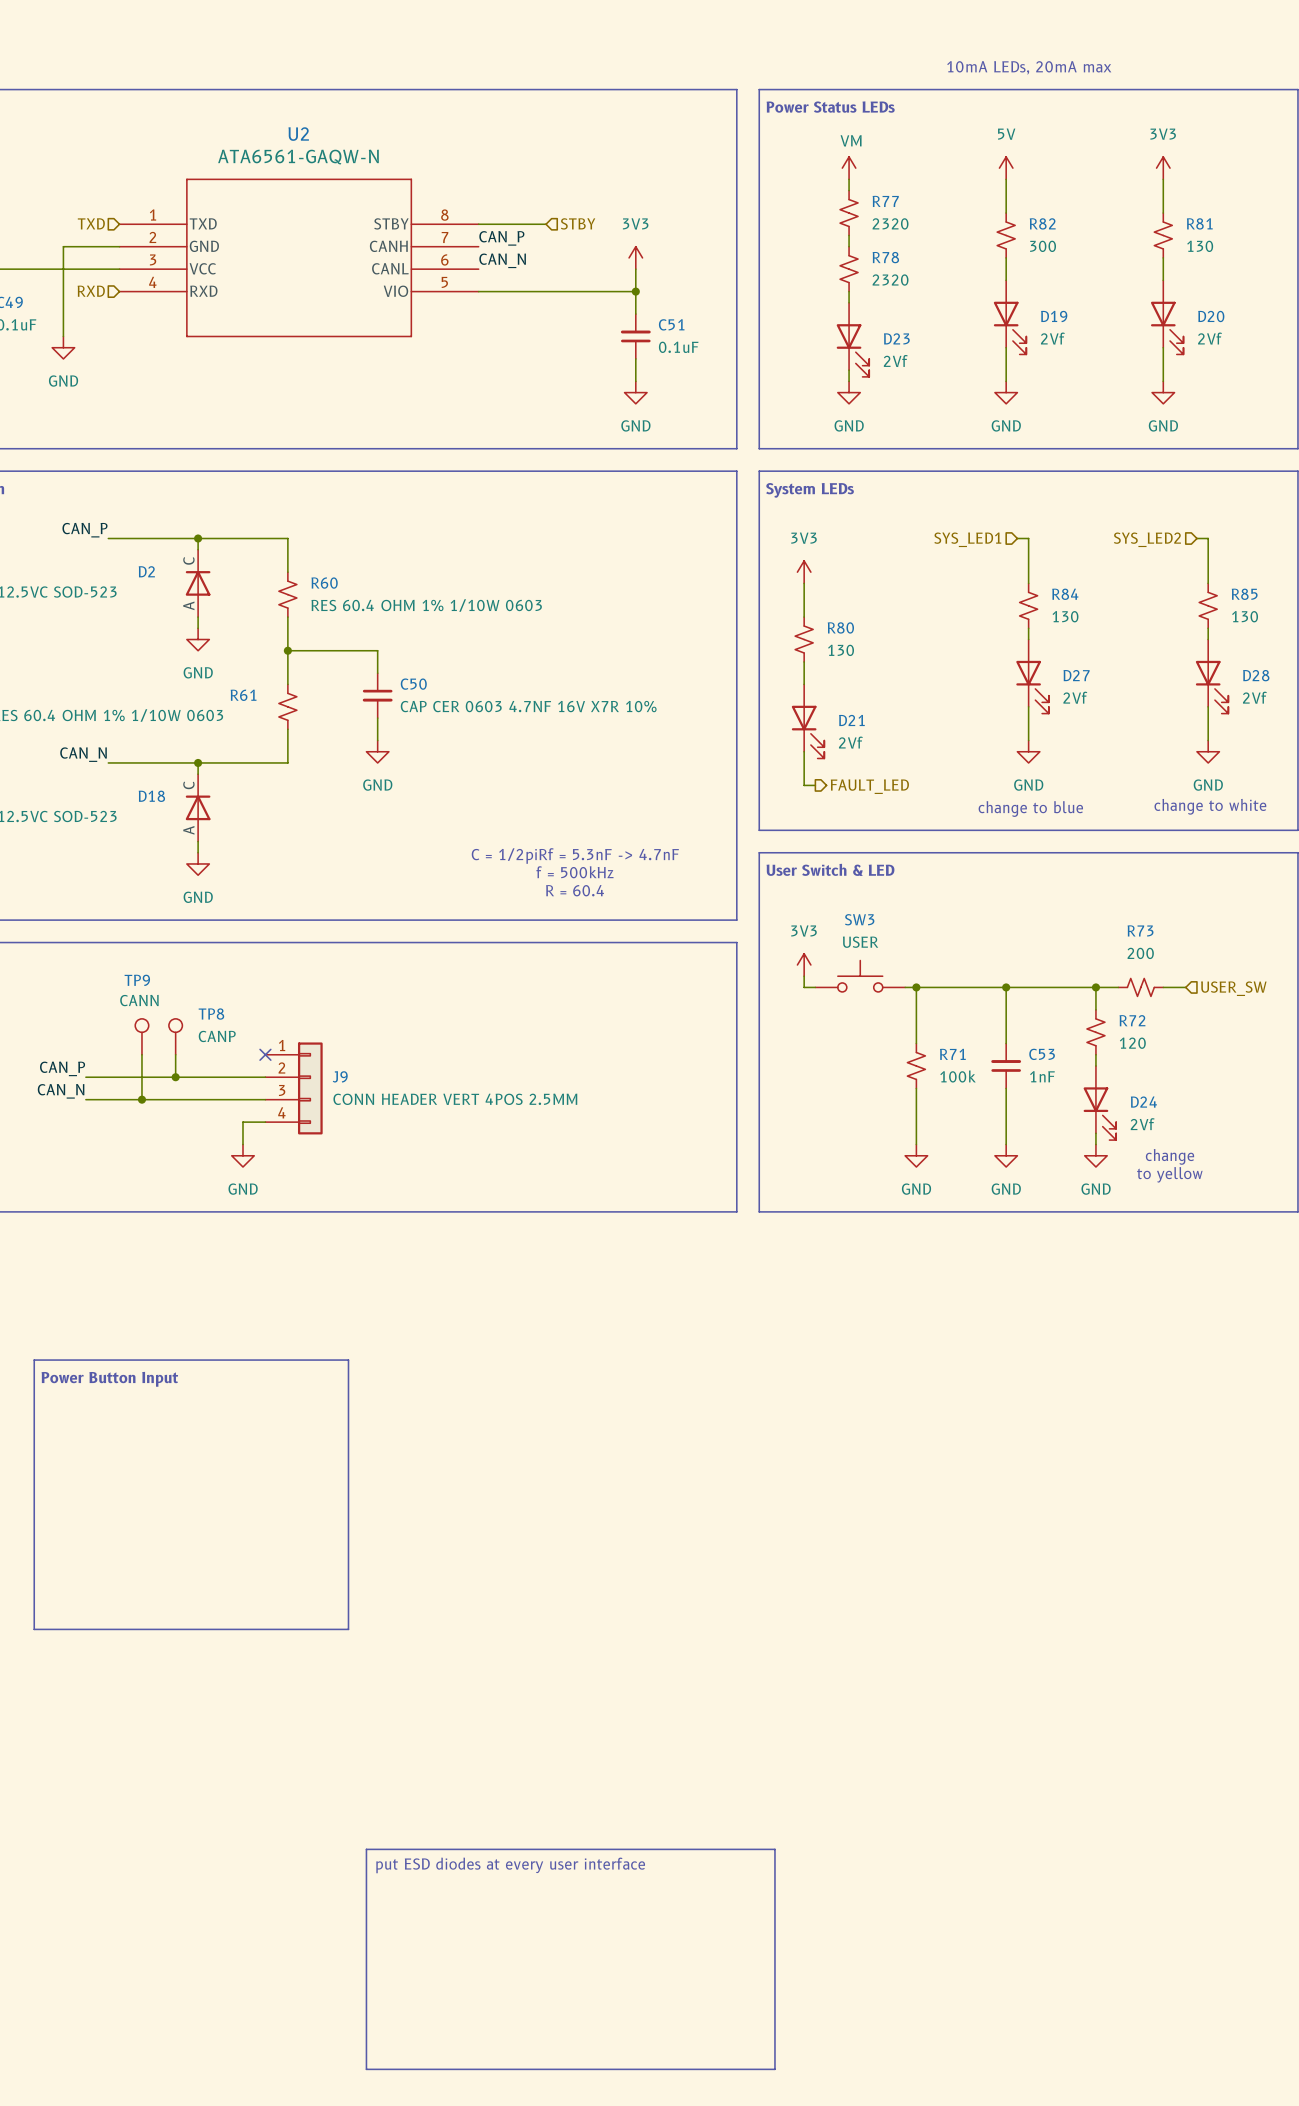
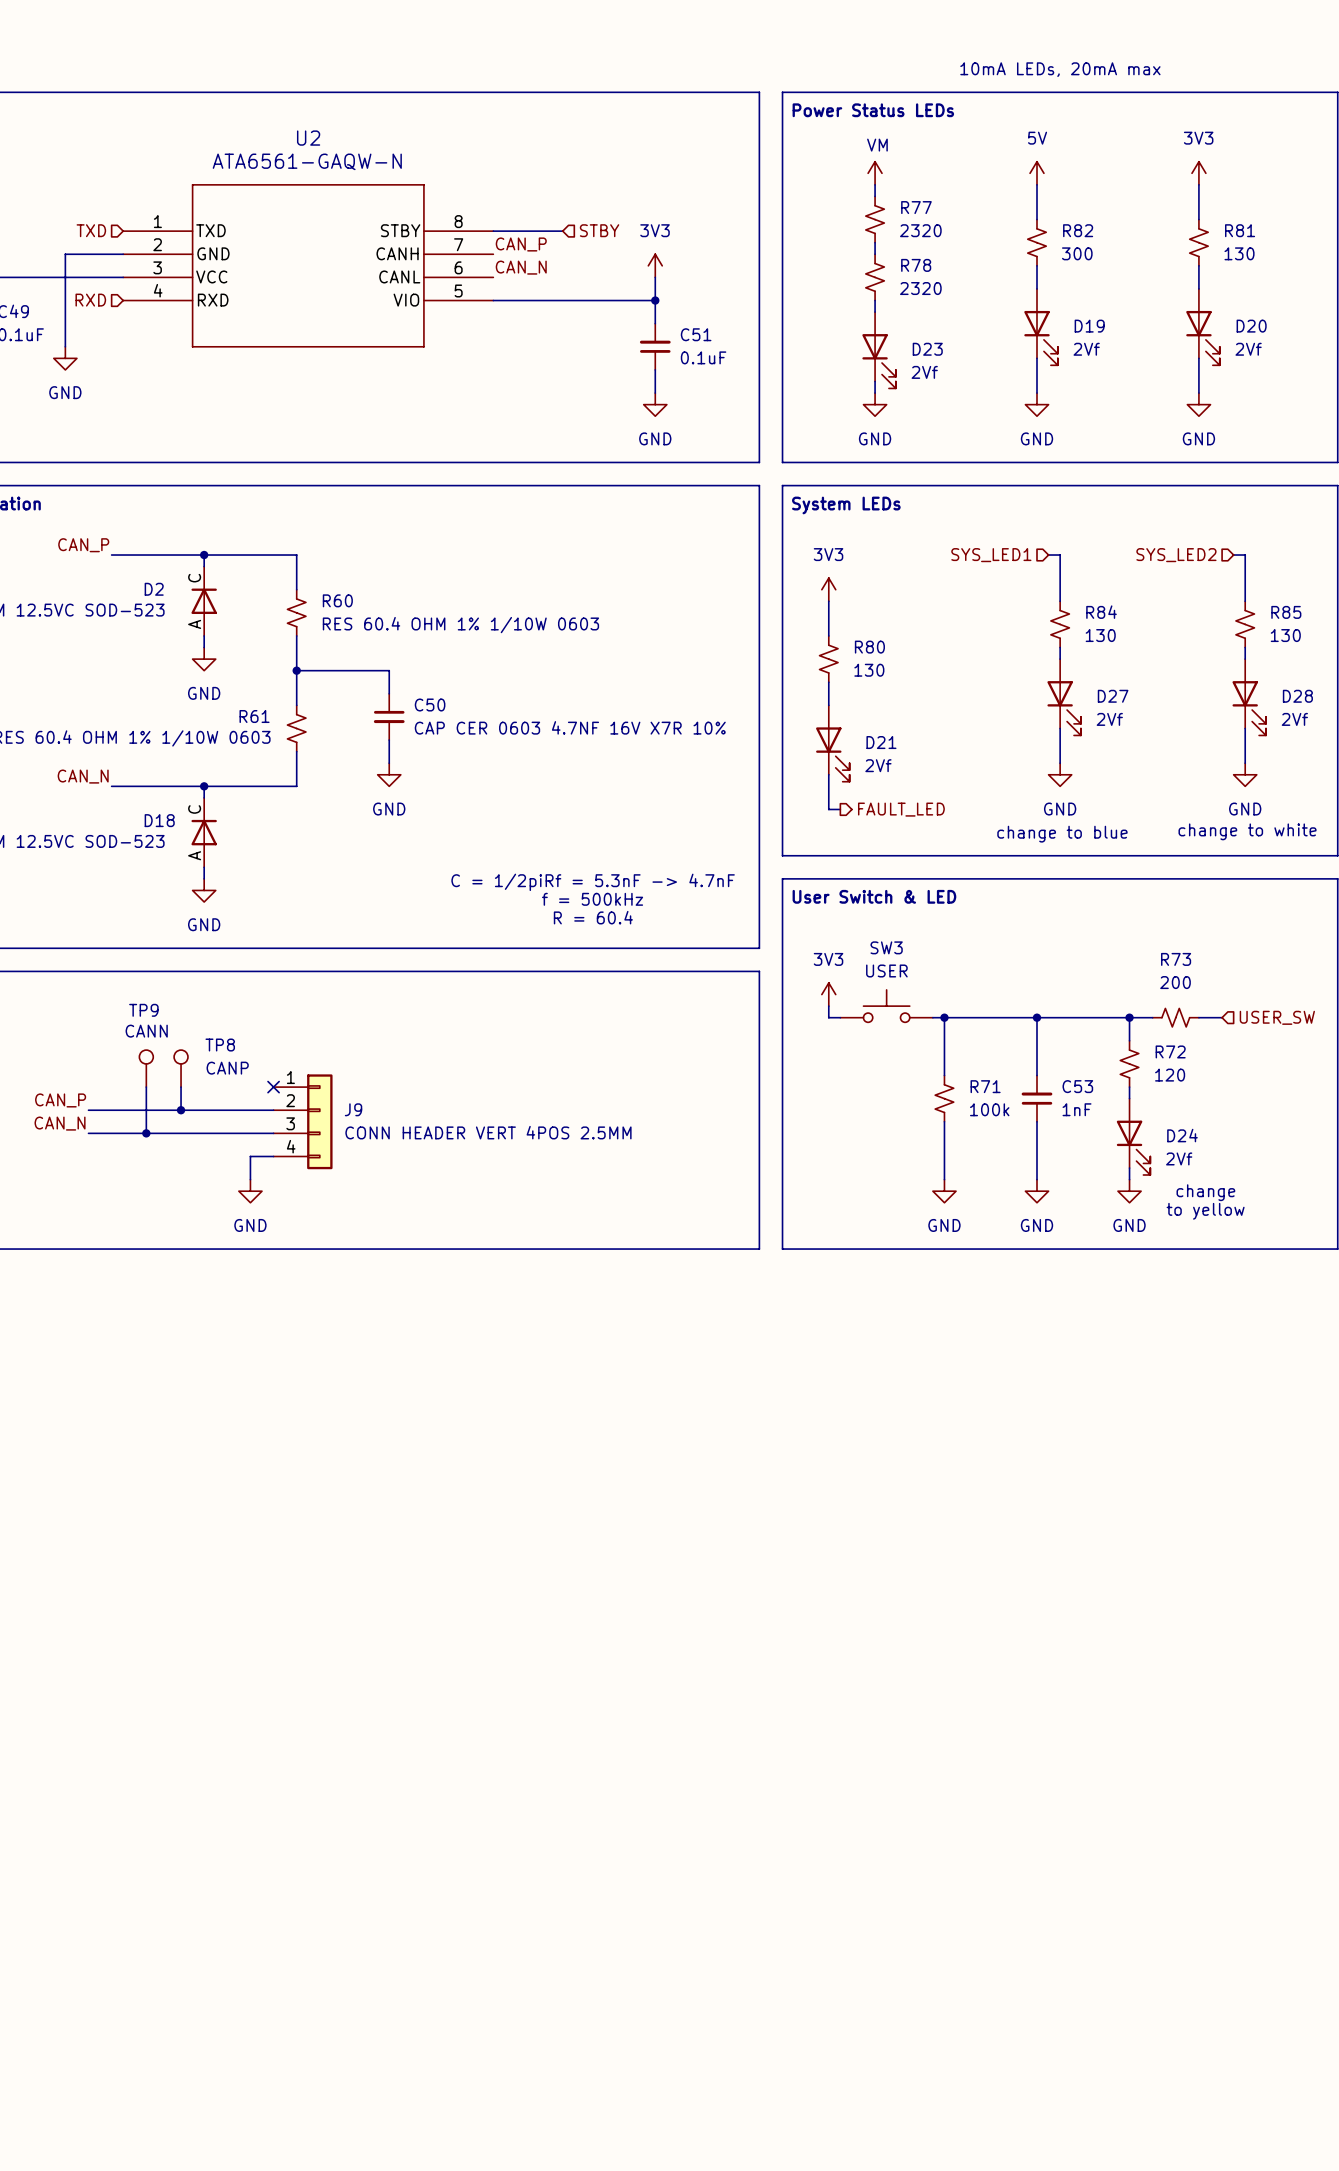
line: (34, 1360) (348, 1360) (348, 1629) (34, 1629) (34, 1360) -> none
text: Power Button Input (109, 1379) -> none
line: (366, 1849) (774, 1849) (774, 2069) (366, 2069) (366, 1849) -> none
text: put ESD diodes at every user interface (510, 1865) -> none

